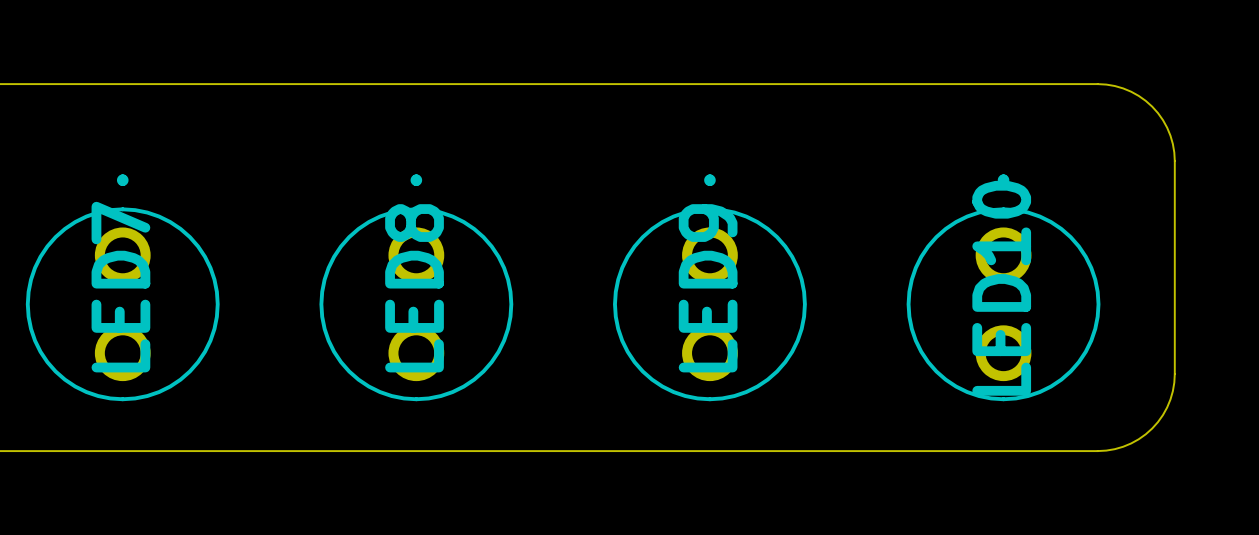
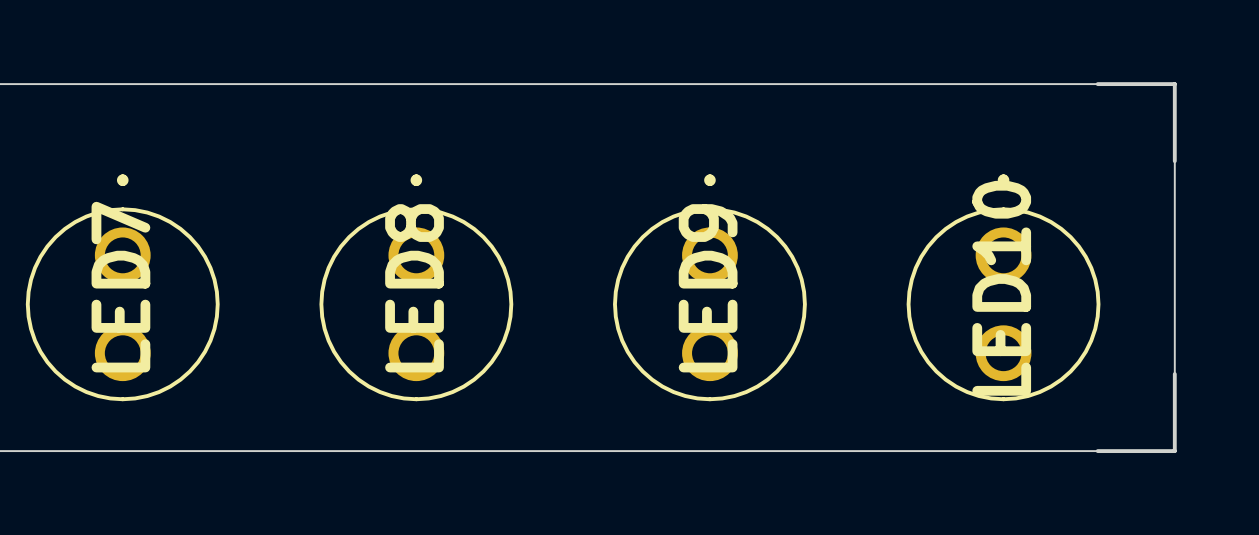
board edge: (1097, 84) (1123, 88) (1138, 95) (1152, 106) (1162, 120) (1170, 135) (1174, 161) -> (1097, 84) (1174, 84) (1174, 161)
board edge: (1174, 374) (1170, 399) (1162, 415) (1152, 428) (1138, 439) (1123, 446) (1097, 451) -> (1174, 374) (1174, 451) (1097, 451)

